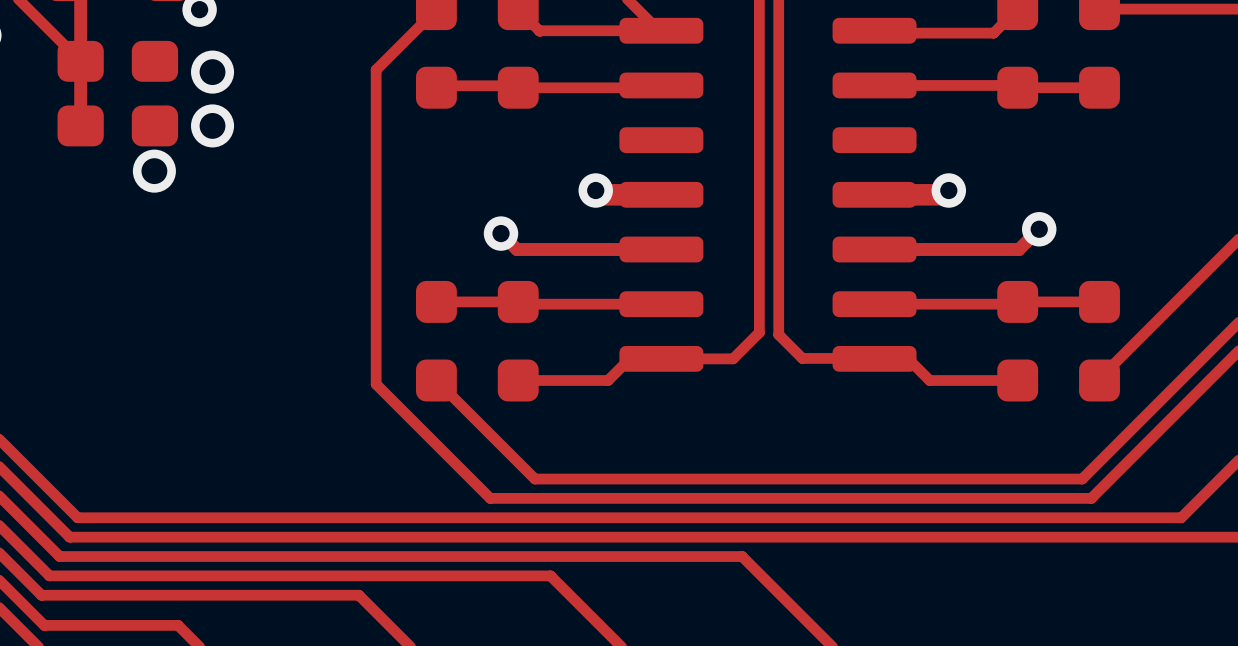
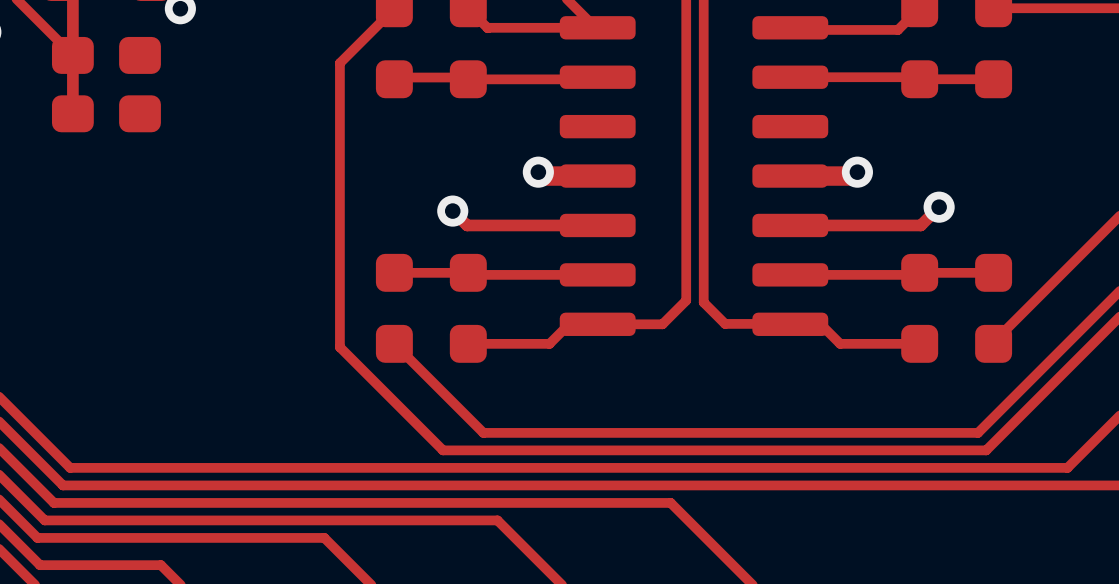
via: (212, 72) -> none
via: (212, 125) -> none
via: (154, 171) -> none

